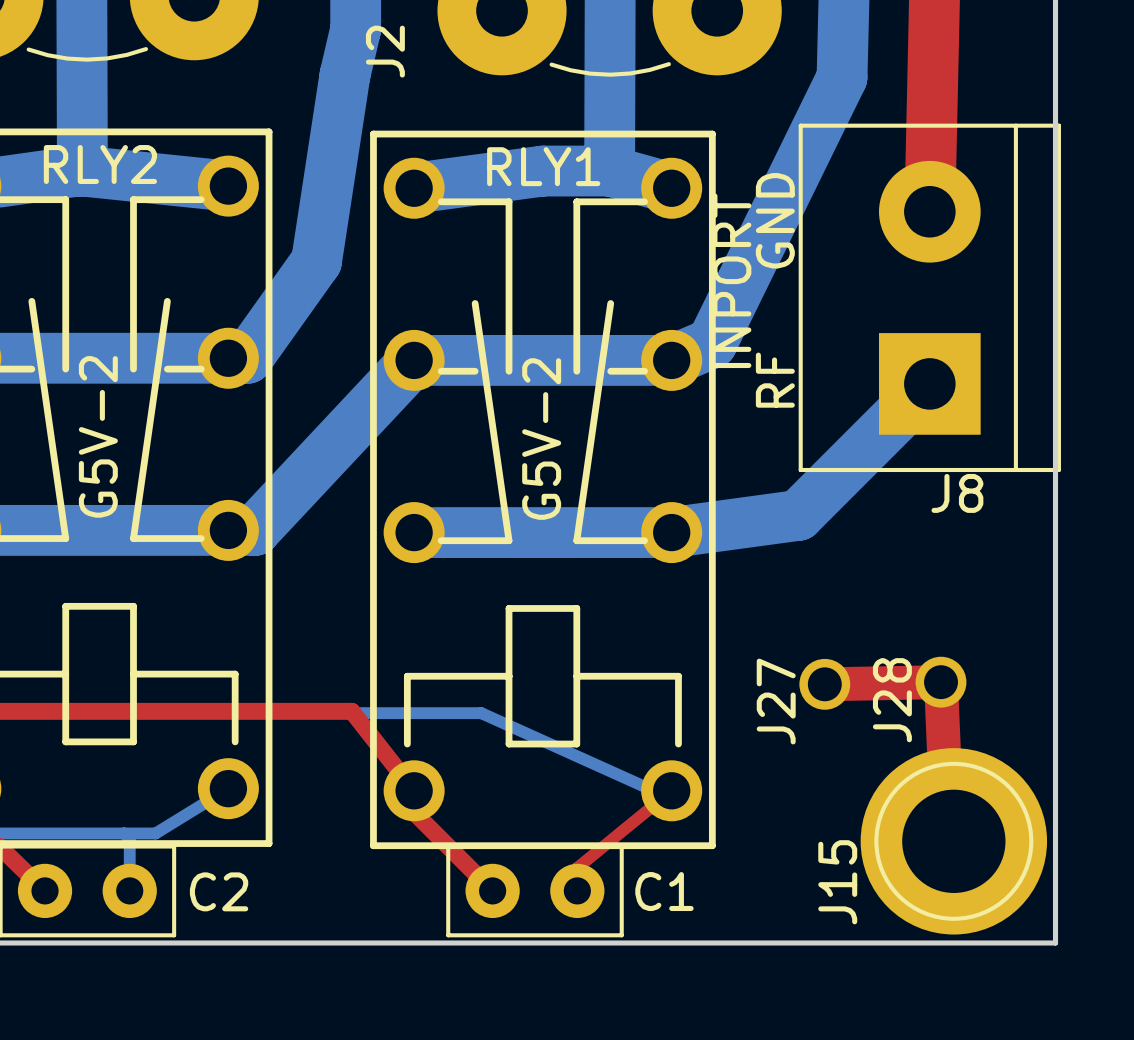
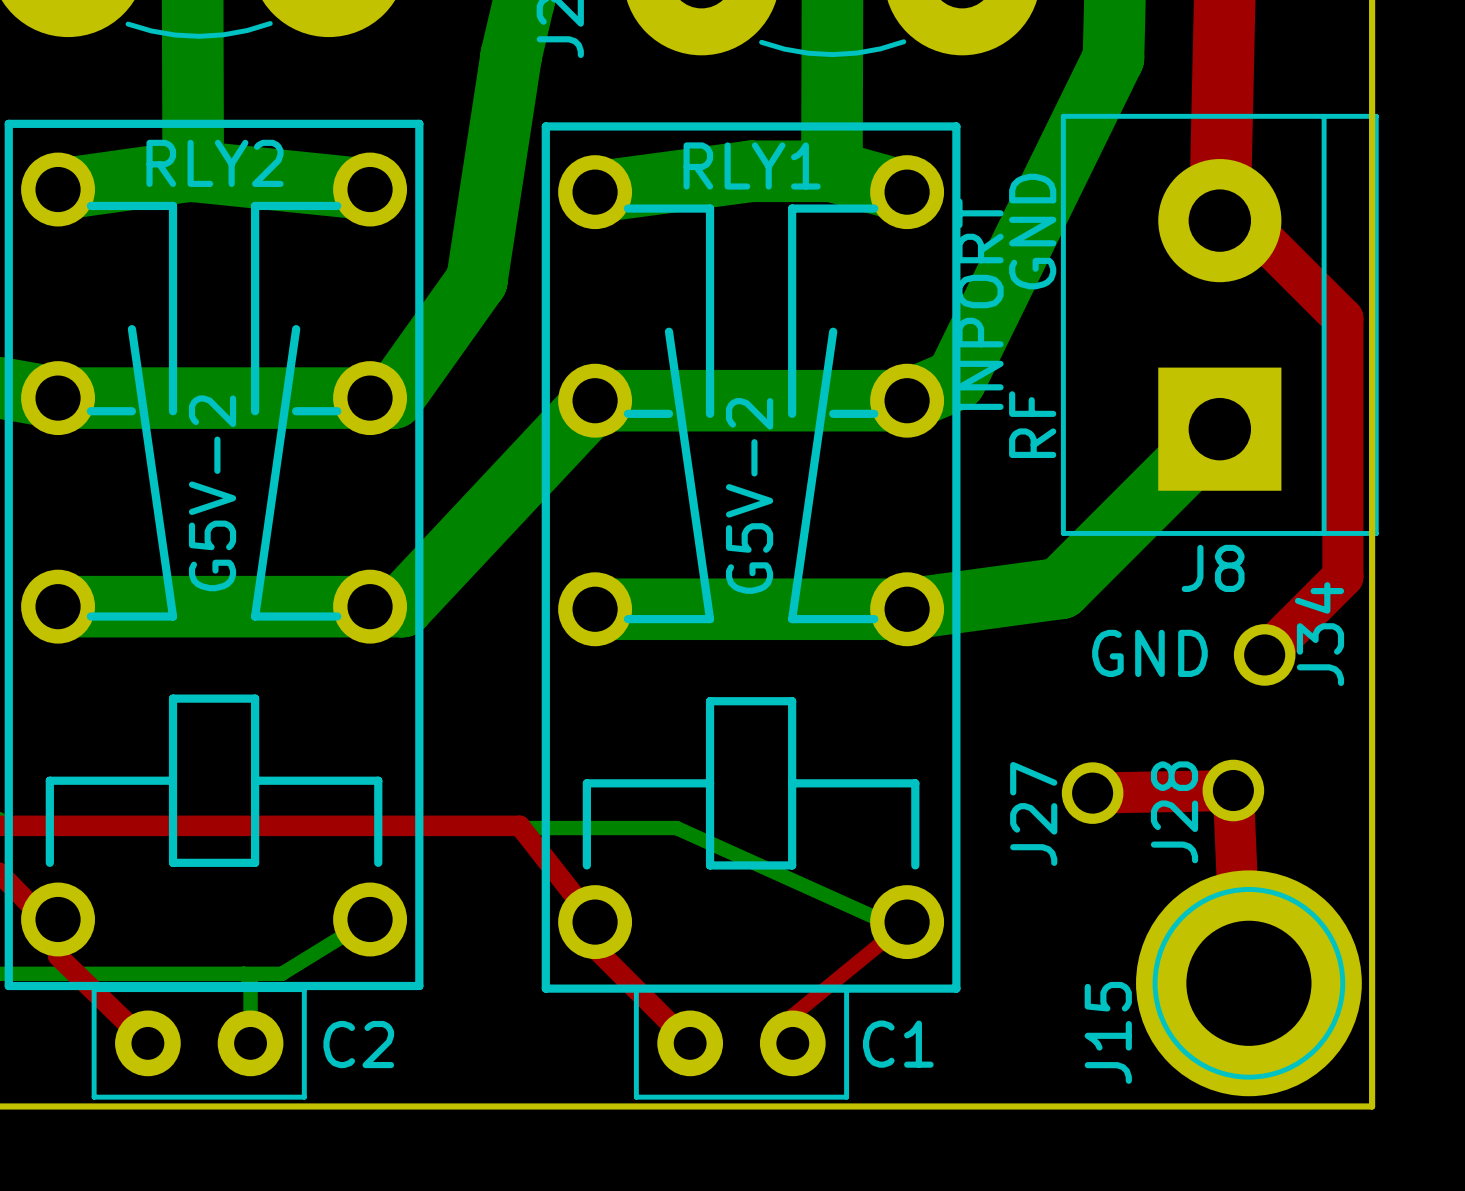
top track: none -> (1219, 220) (1244, 220) (1342, 318) (1342, 576) (1264, 654)
J8 name position: J8 (957, 493) -> J8 (1213, 568)
text: none -> GND (1149, 653)
J34: none -> (1264, 654)

